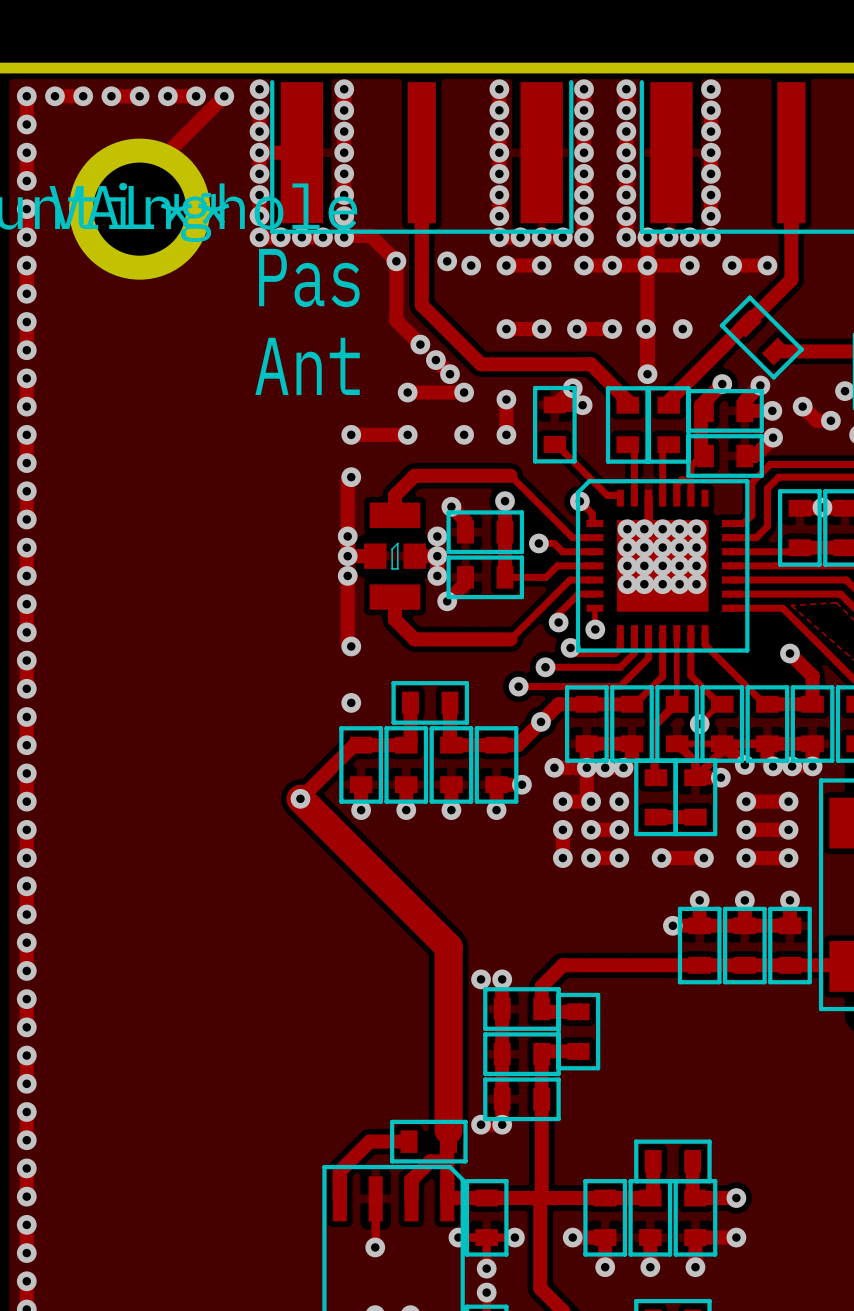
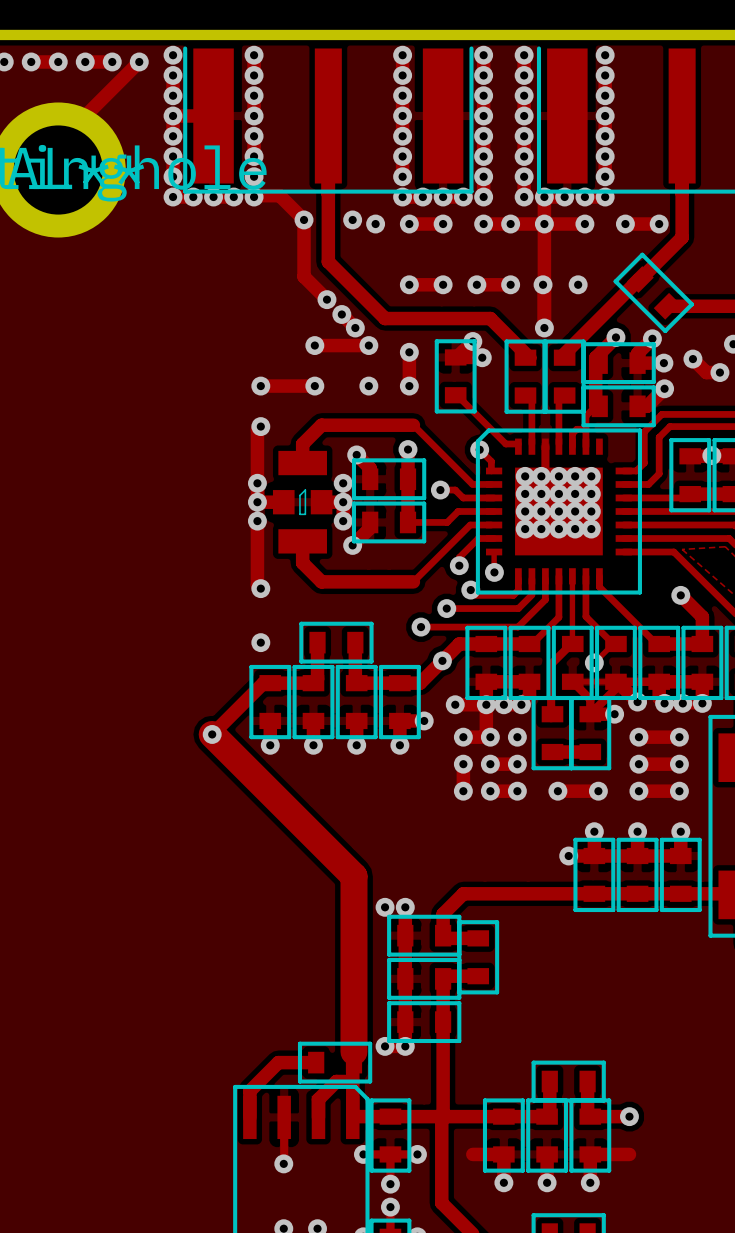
text: Pas (309, 278) -> none
text: Ant (307, 366) -> none
via: (572, 1237) -> none
via: (736, 1237) -> none

